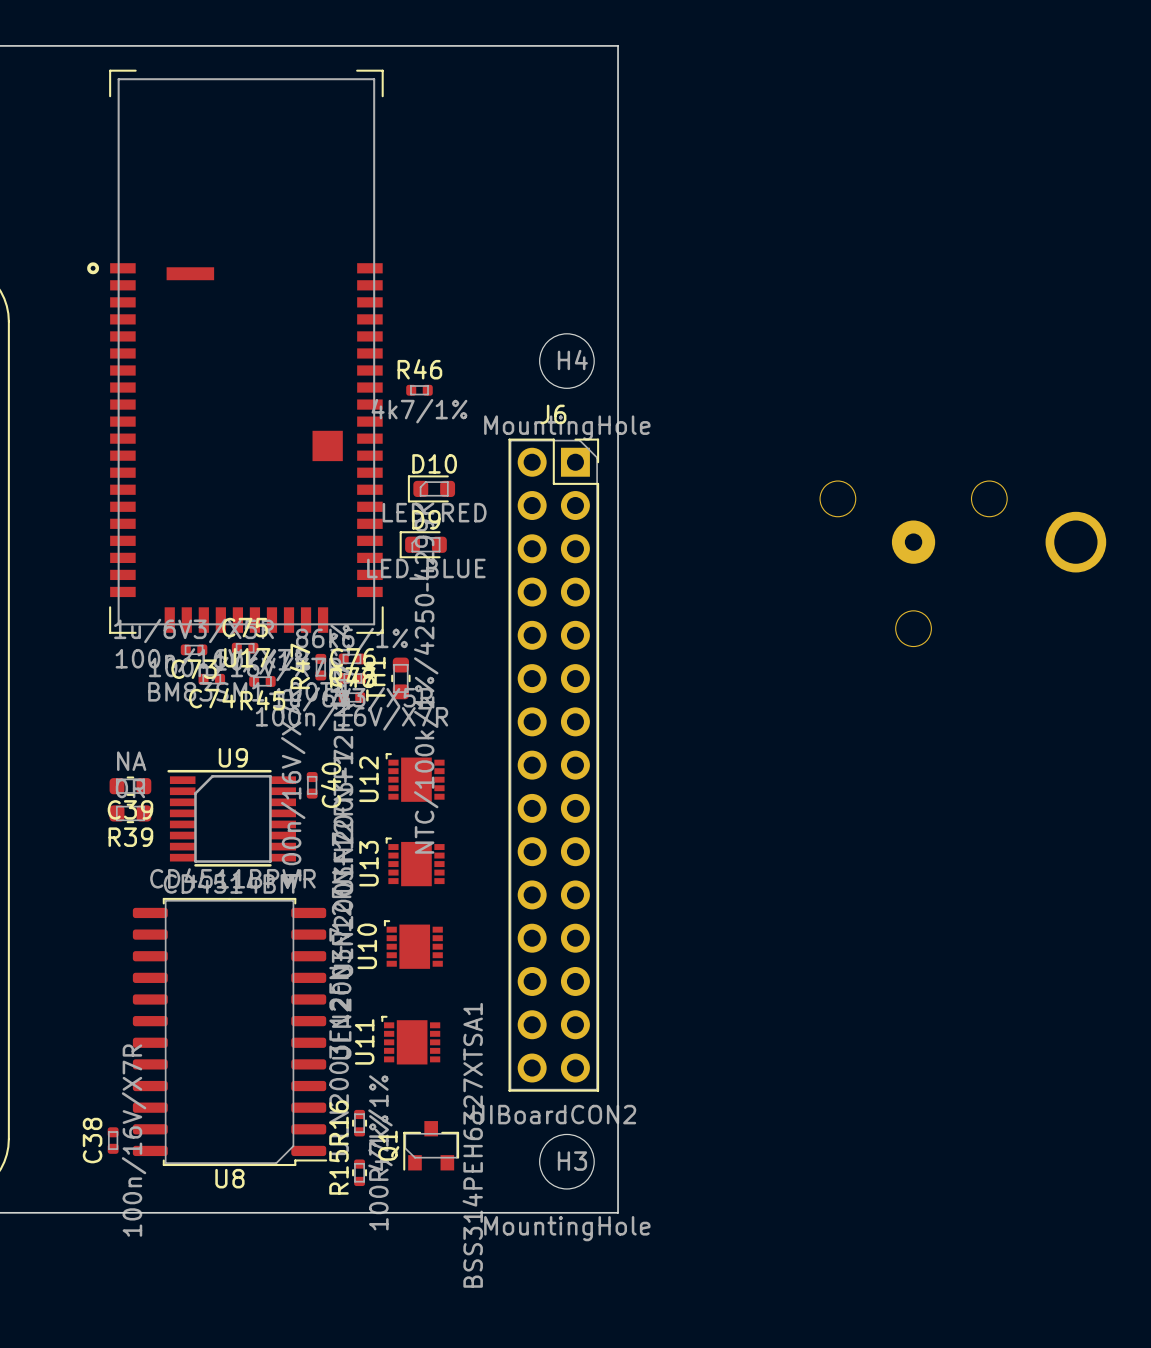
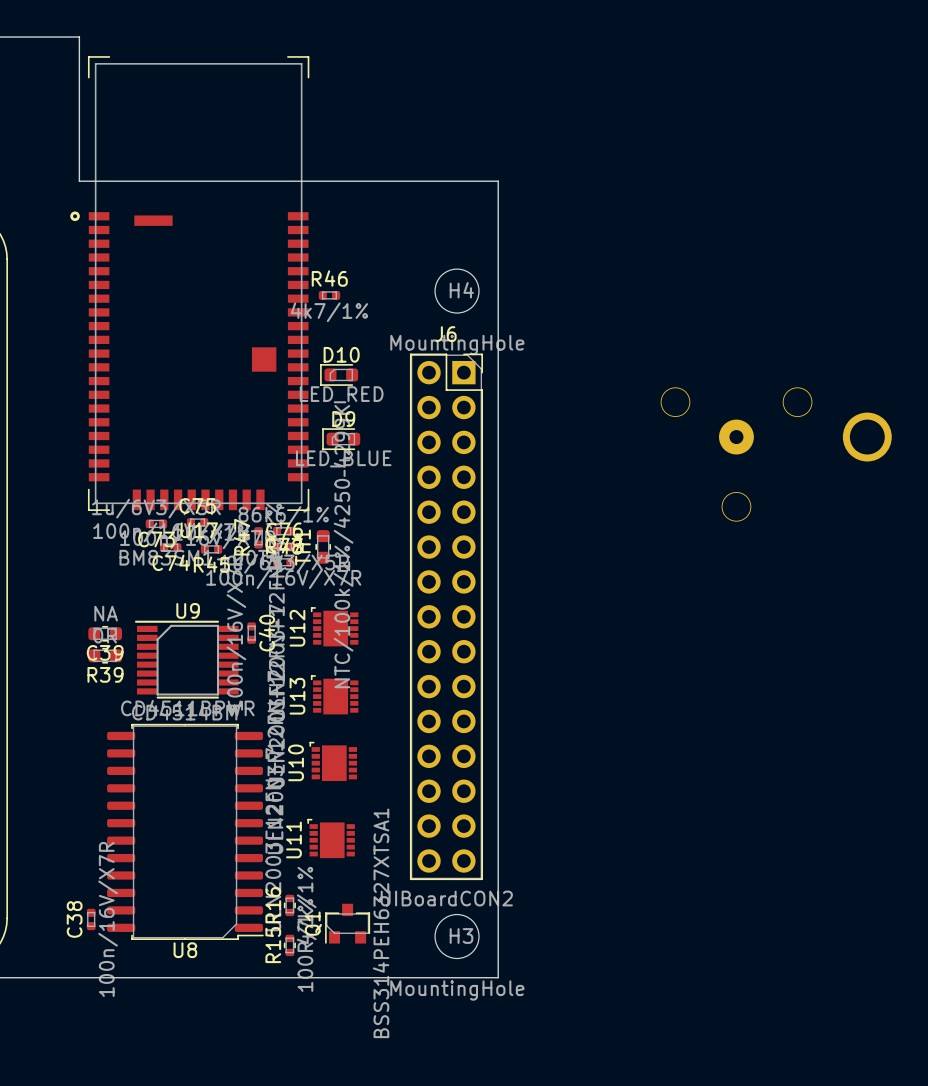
board edge: (98, 45) (618, 45) (618, 224) -> (79, 37) (79, 181) (498, 181)
R46 position: (419, 390) -> (329, 295)
D10 position: (431, 488) -> (339, 374)

